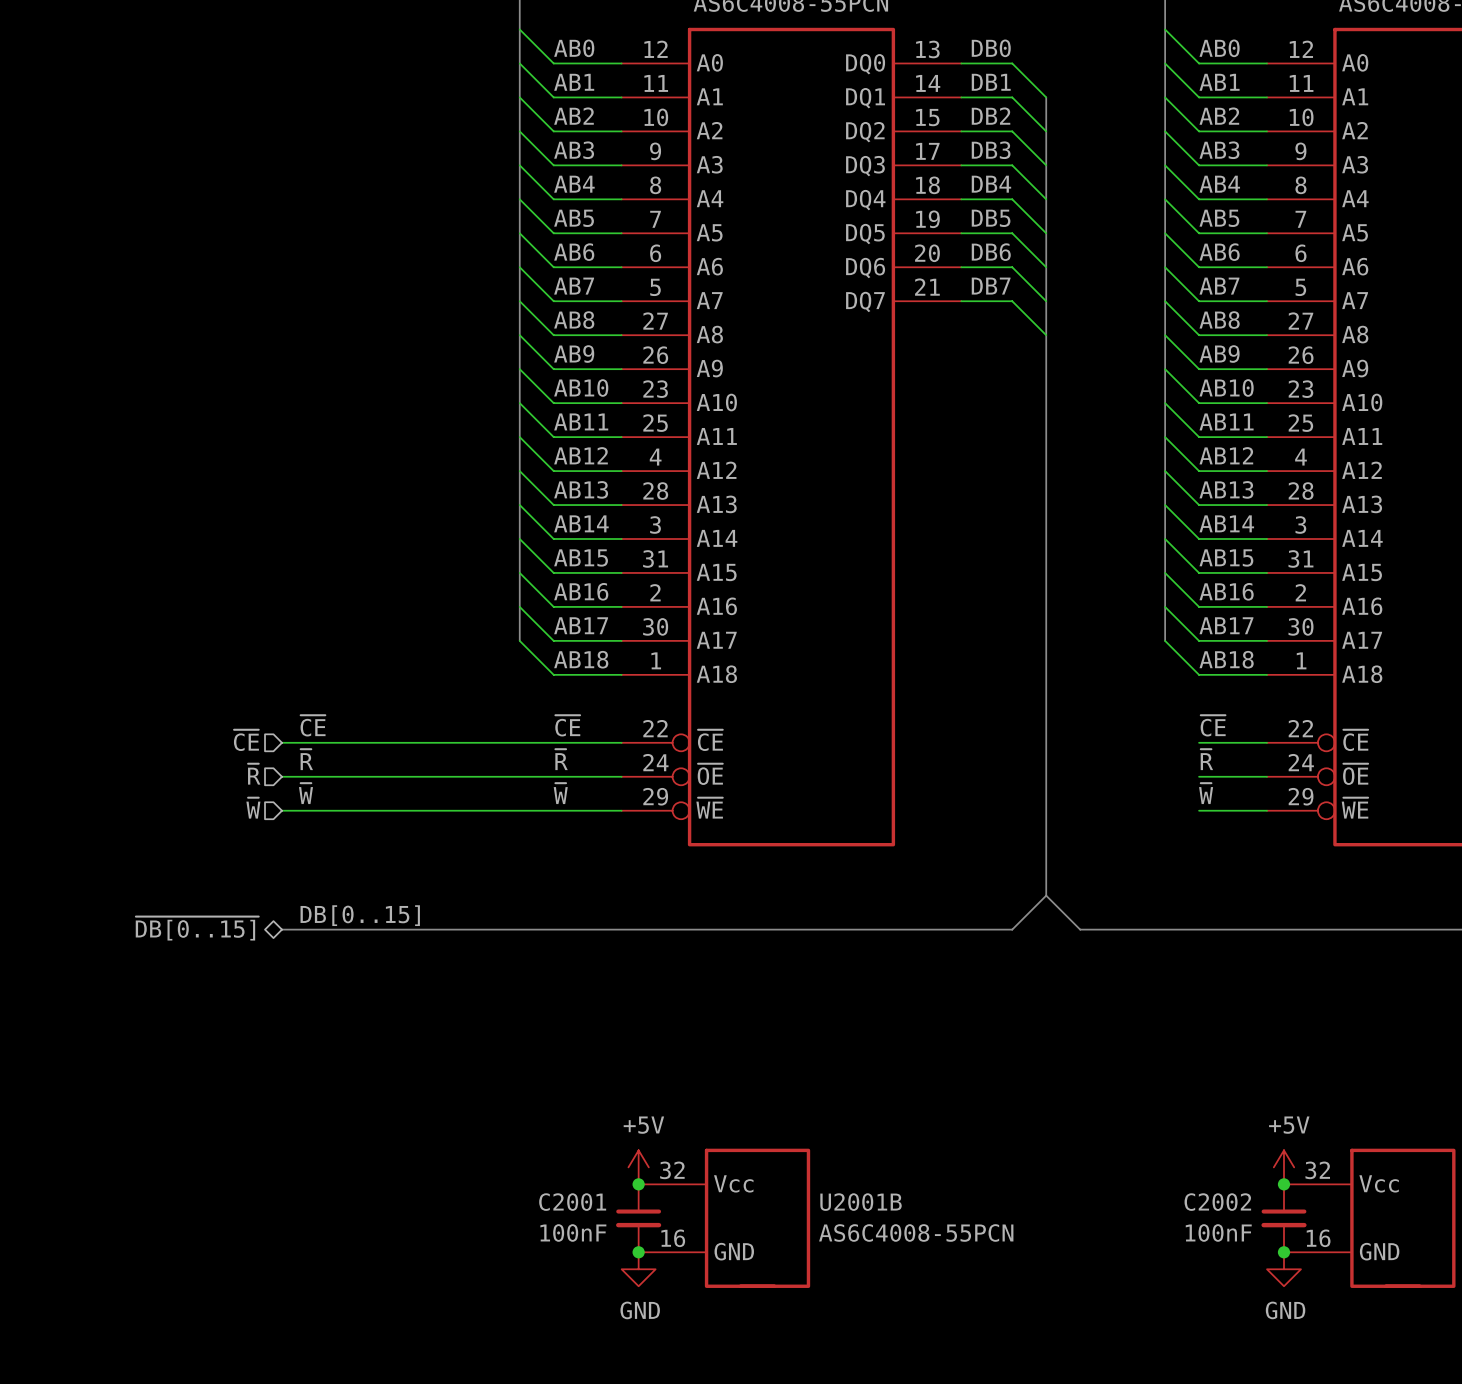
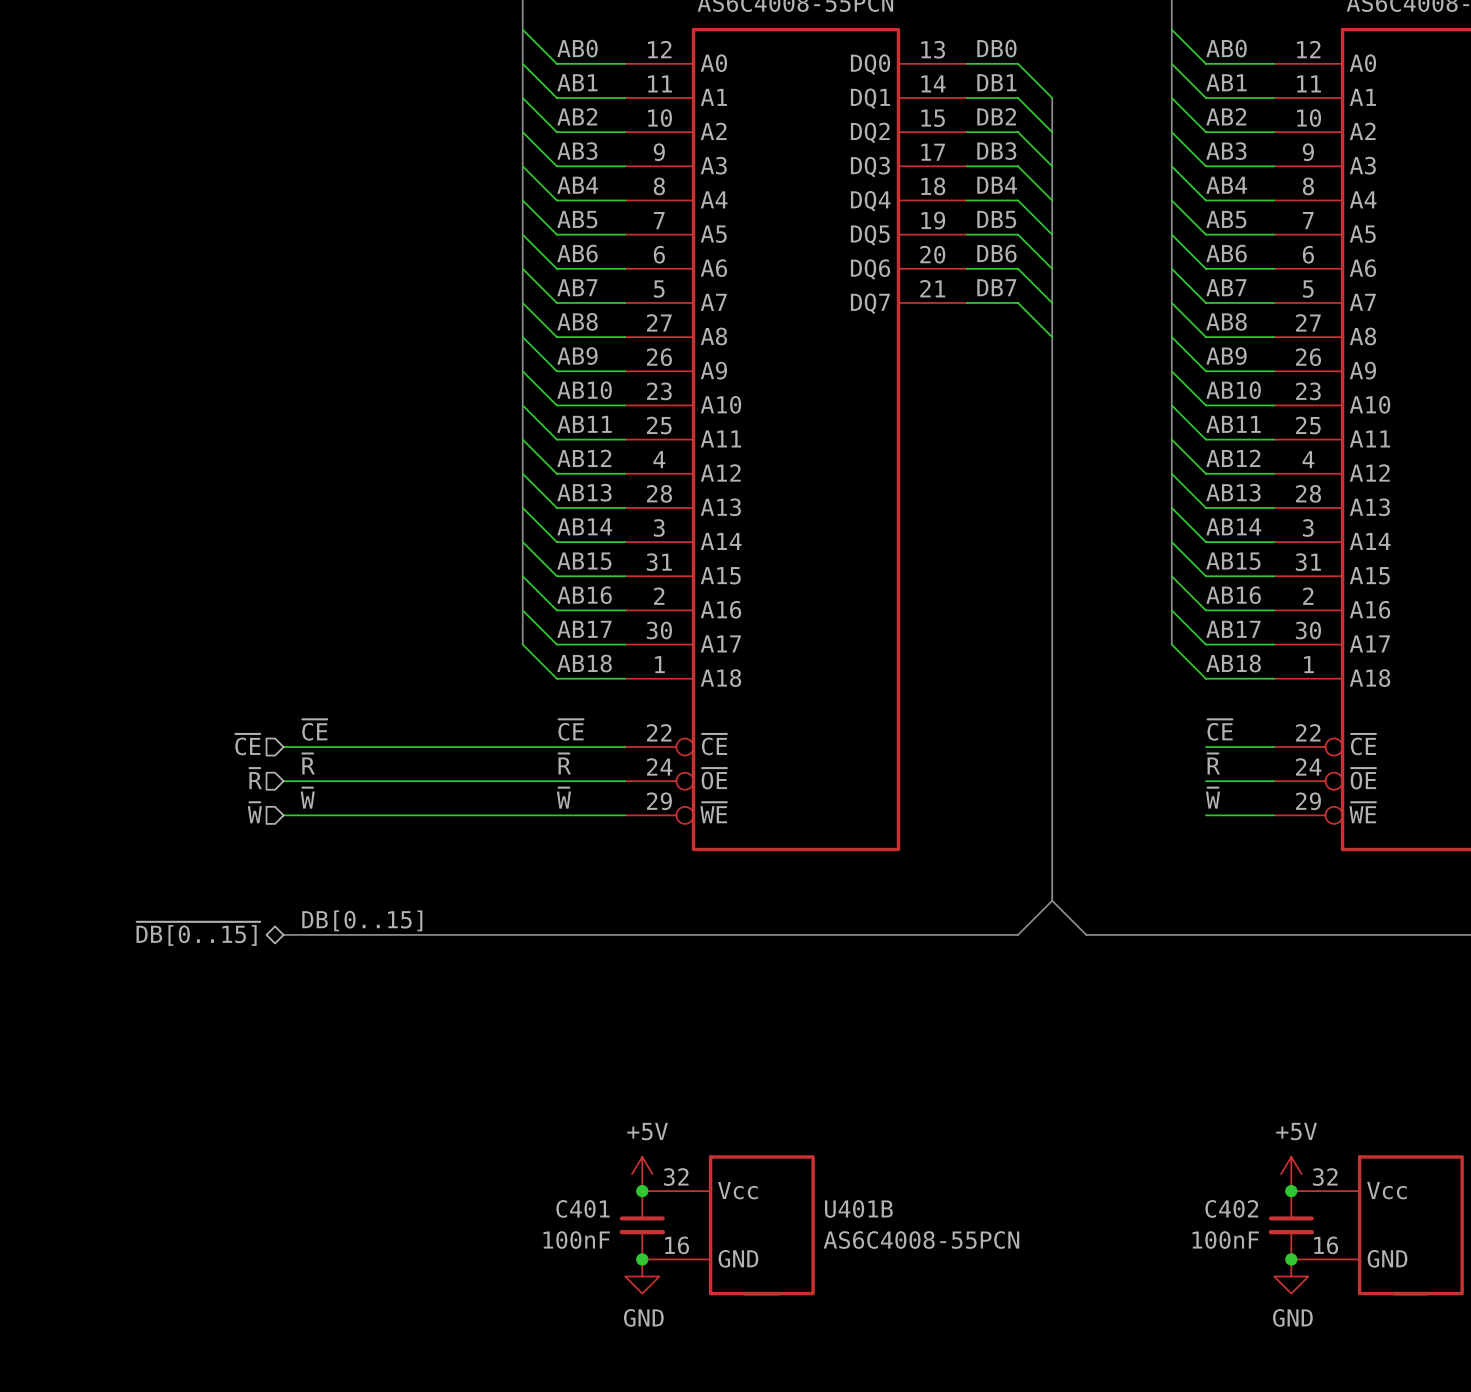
C2001 name: C2001 (572, 1202) -> C401 (582, 1208)
U2001B name: U2001B (861, 1202) -> U401B (858, 1208)
C2002 name: C2002 (1217, 1202) -> C402 (1231, 1208)

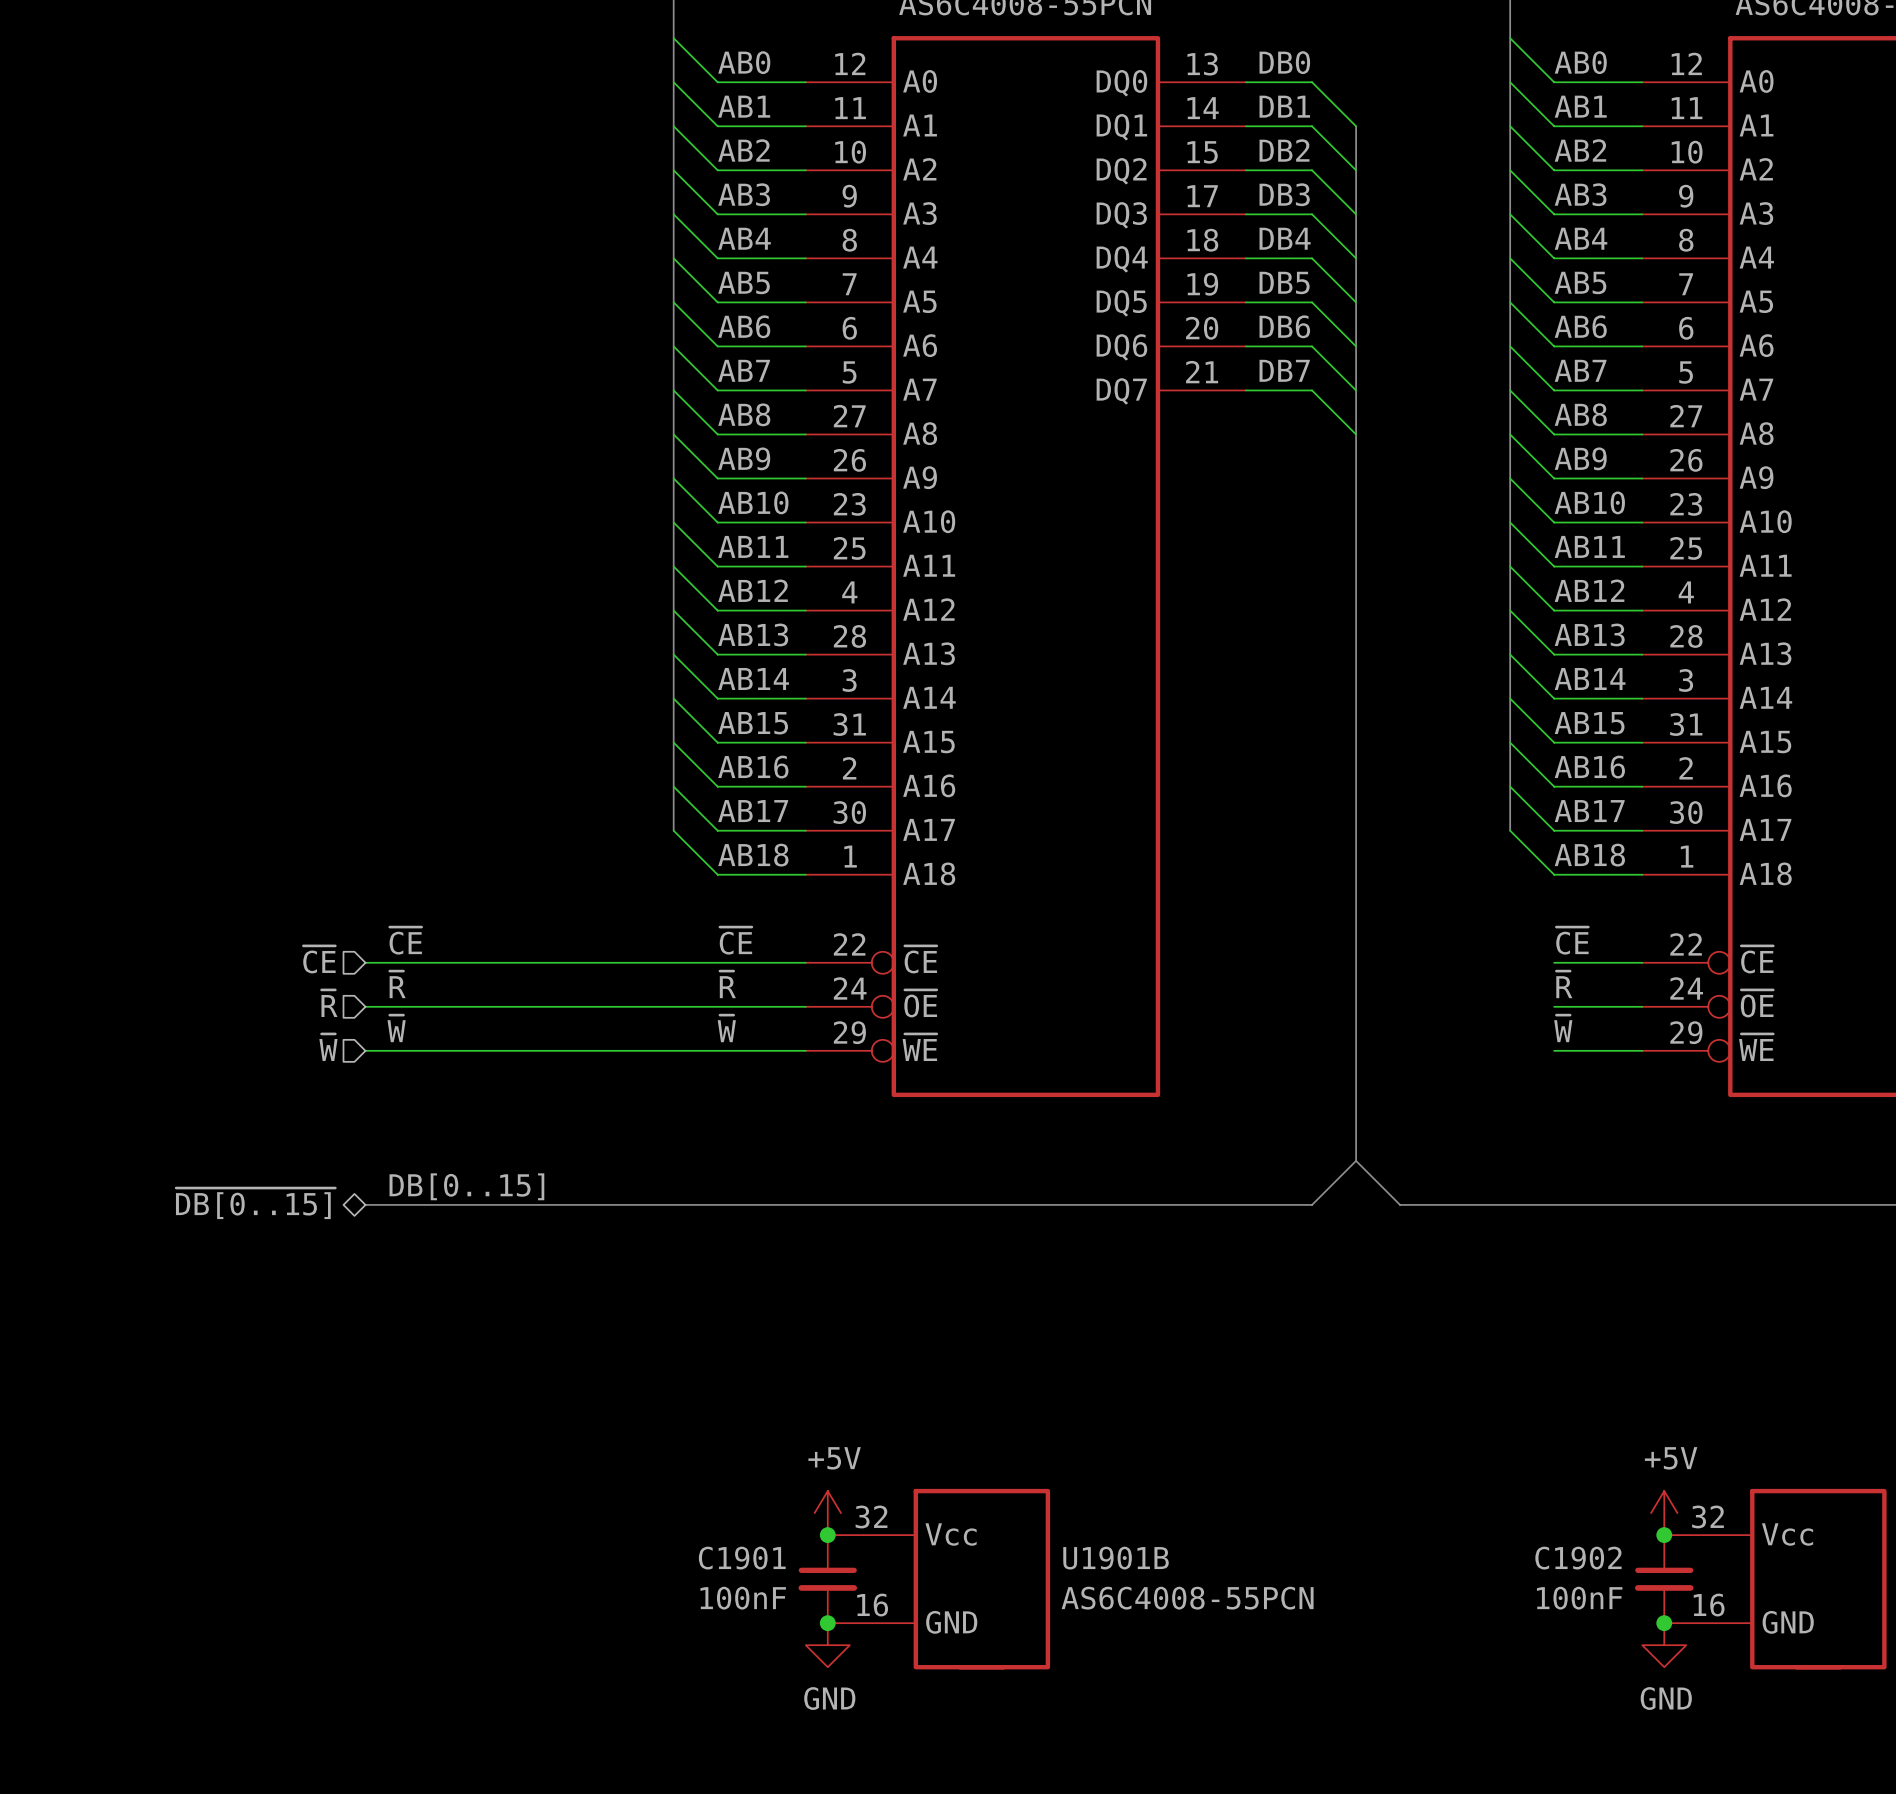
C401 name: C401 (582, 1208) -> C1901 (742, 1558)
U401B name: U401B (858, 1208) -> U1901B (1116, 1558)
C402 name: C402 (1231, 1208) -> C1902 (1578, 1558)

